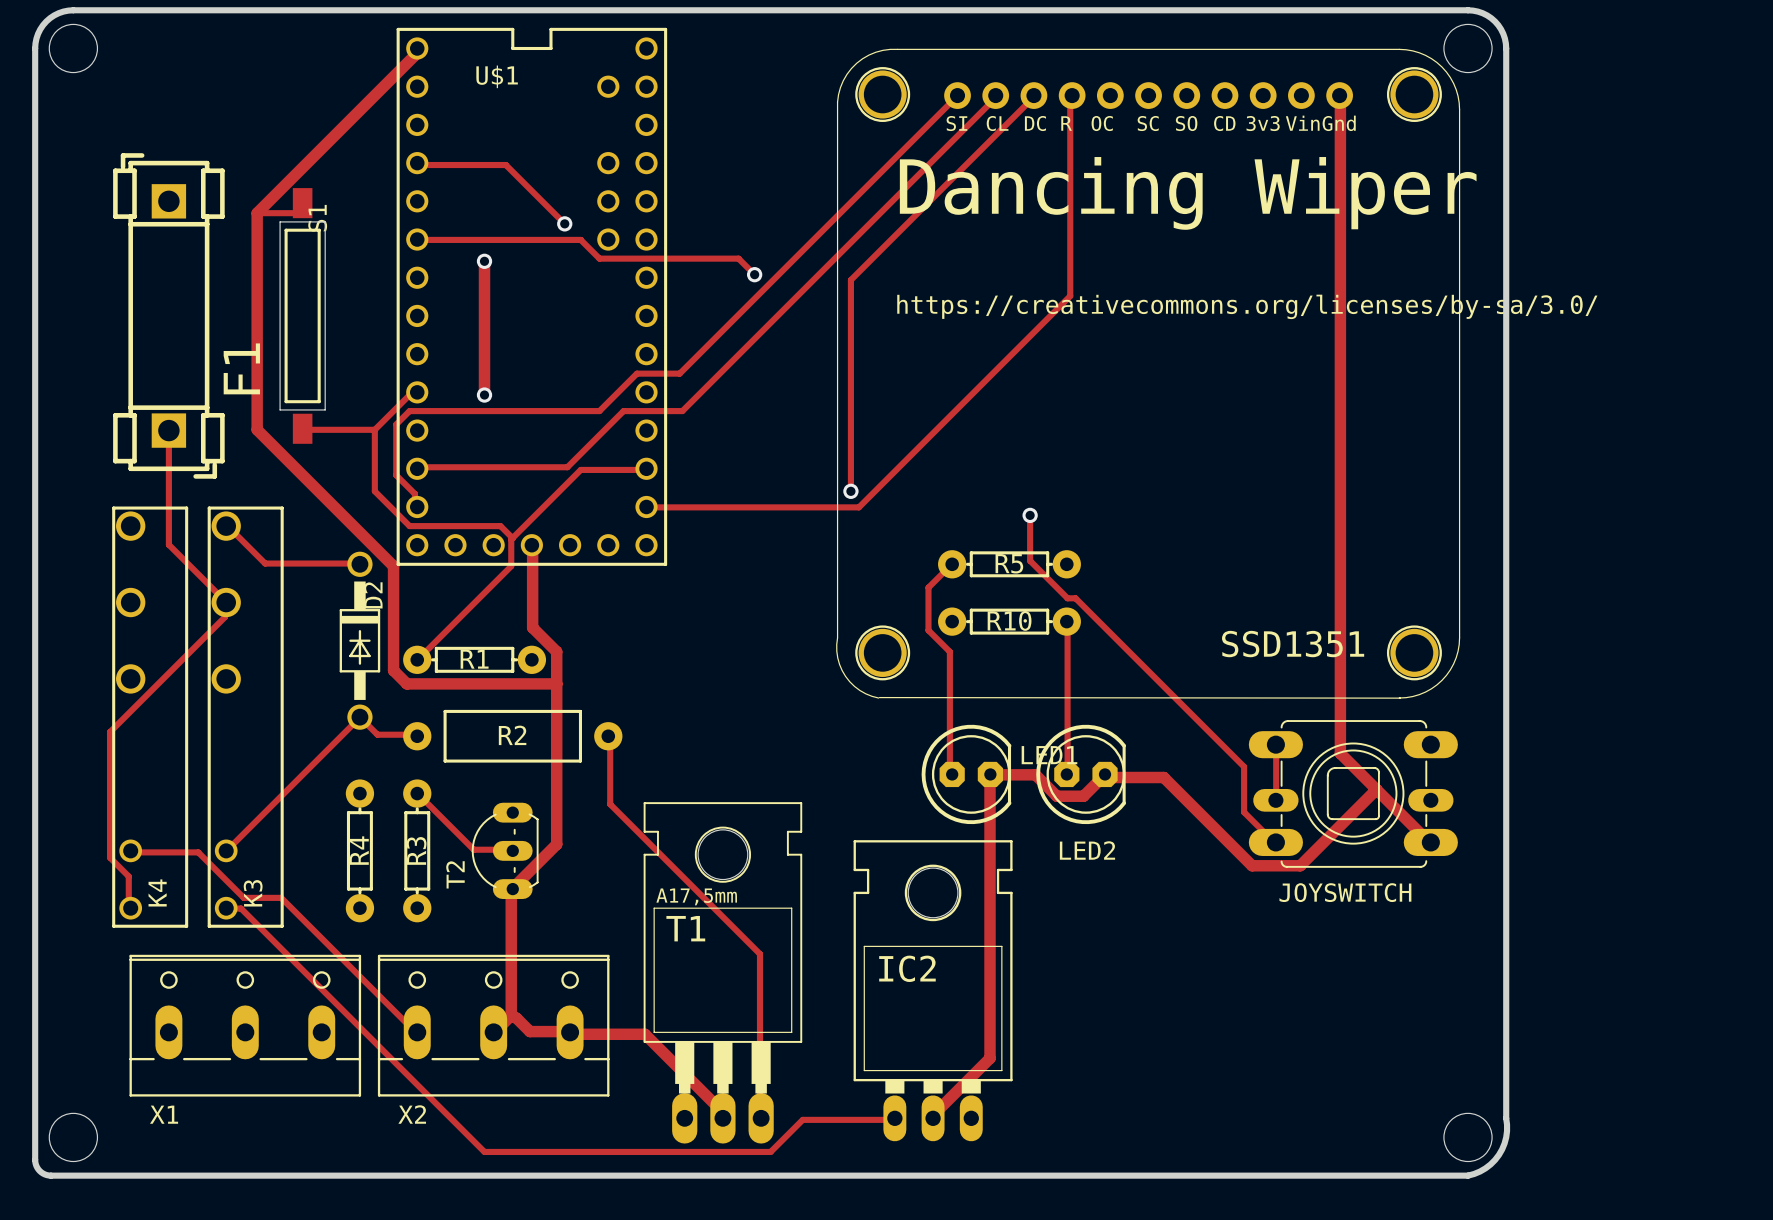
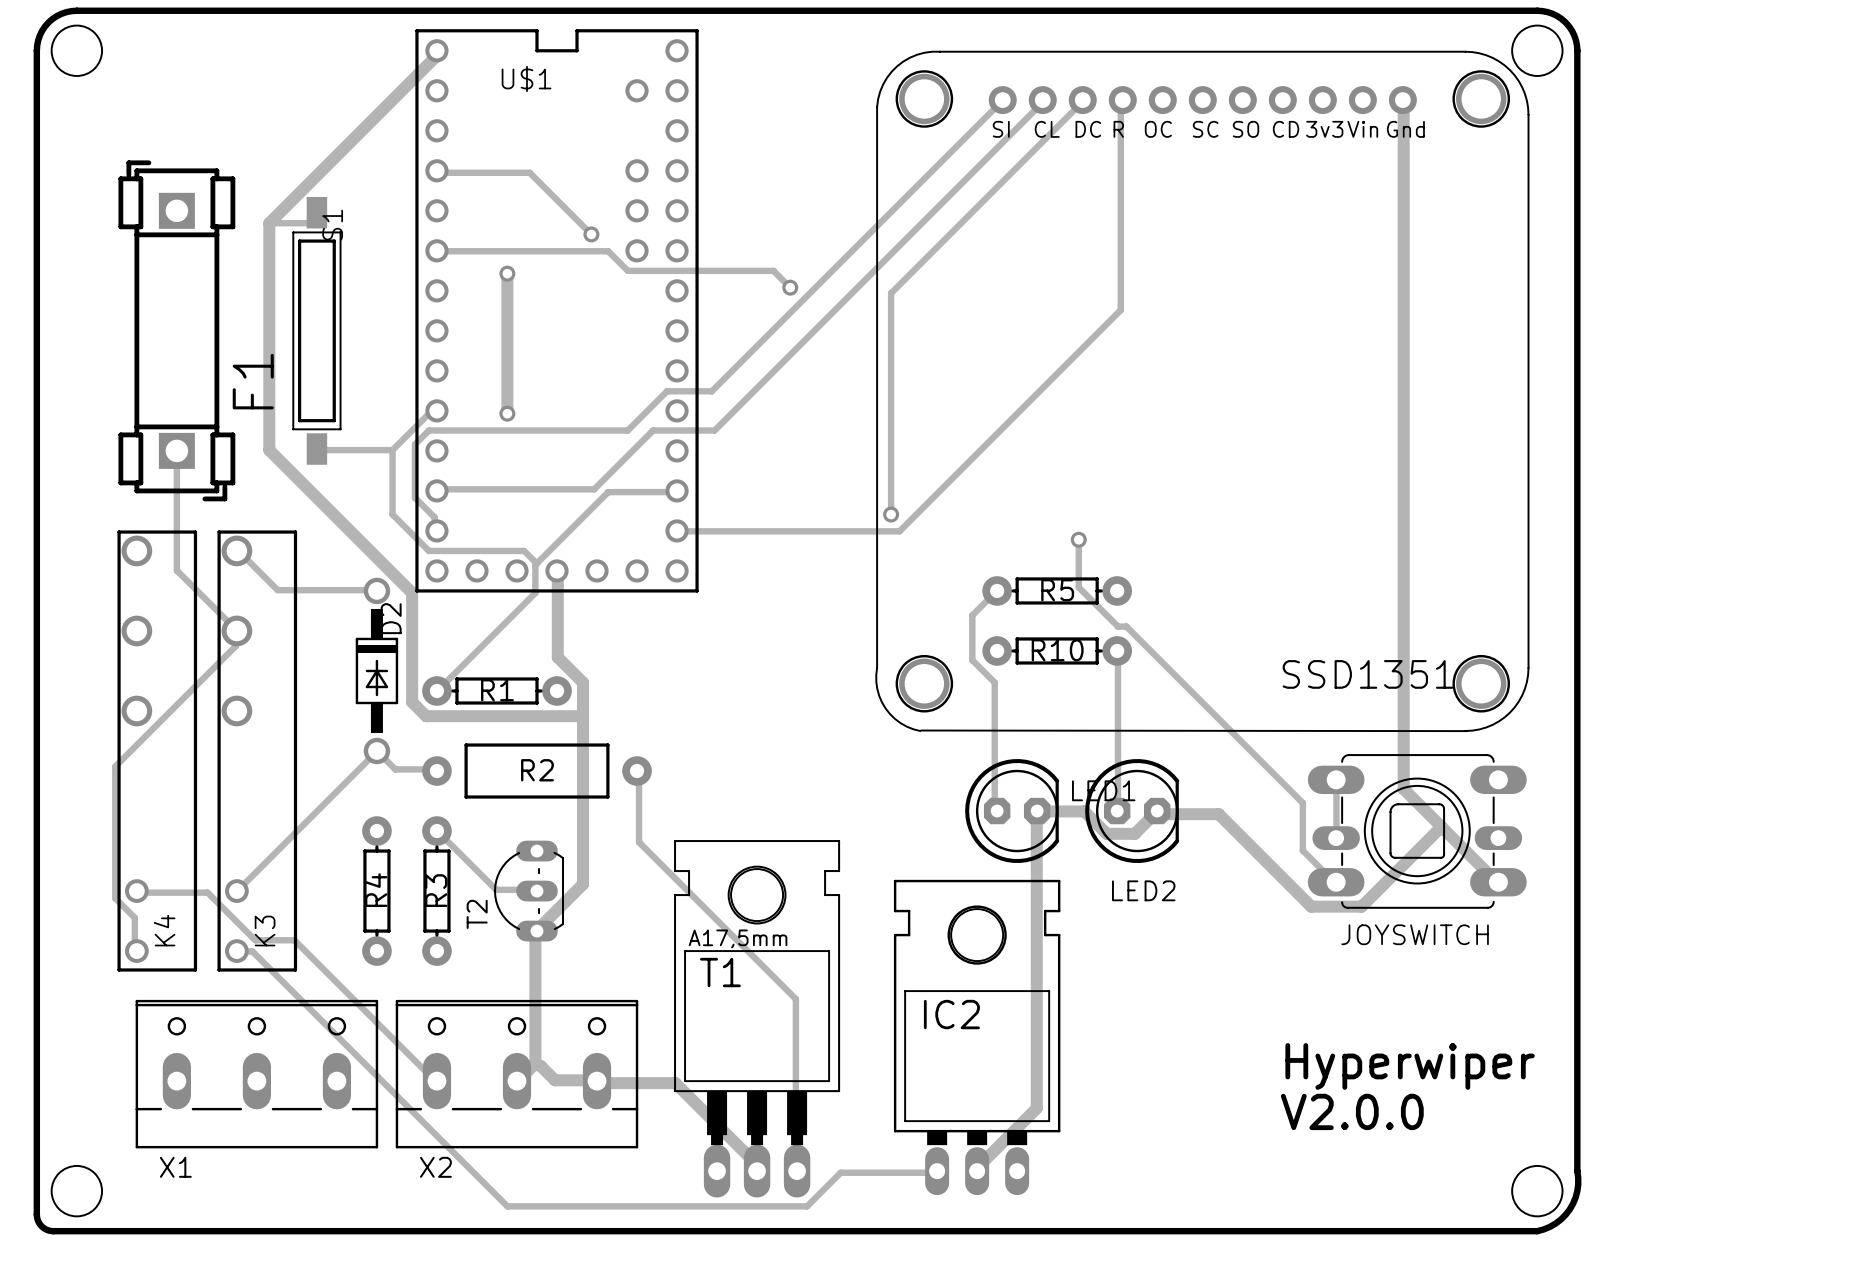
text: Dancing Wiper (1188, 193) -> none
drawing: [897, 294, 1598, 320] -> none
text: none -> Hyperwiper (1410, 1066)
text: none -> V2.0.0 (1352, 1111)

